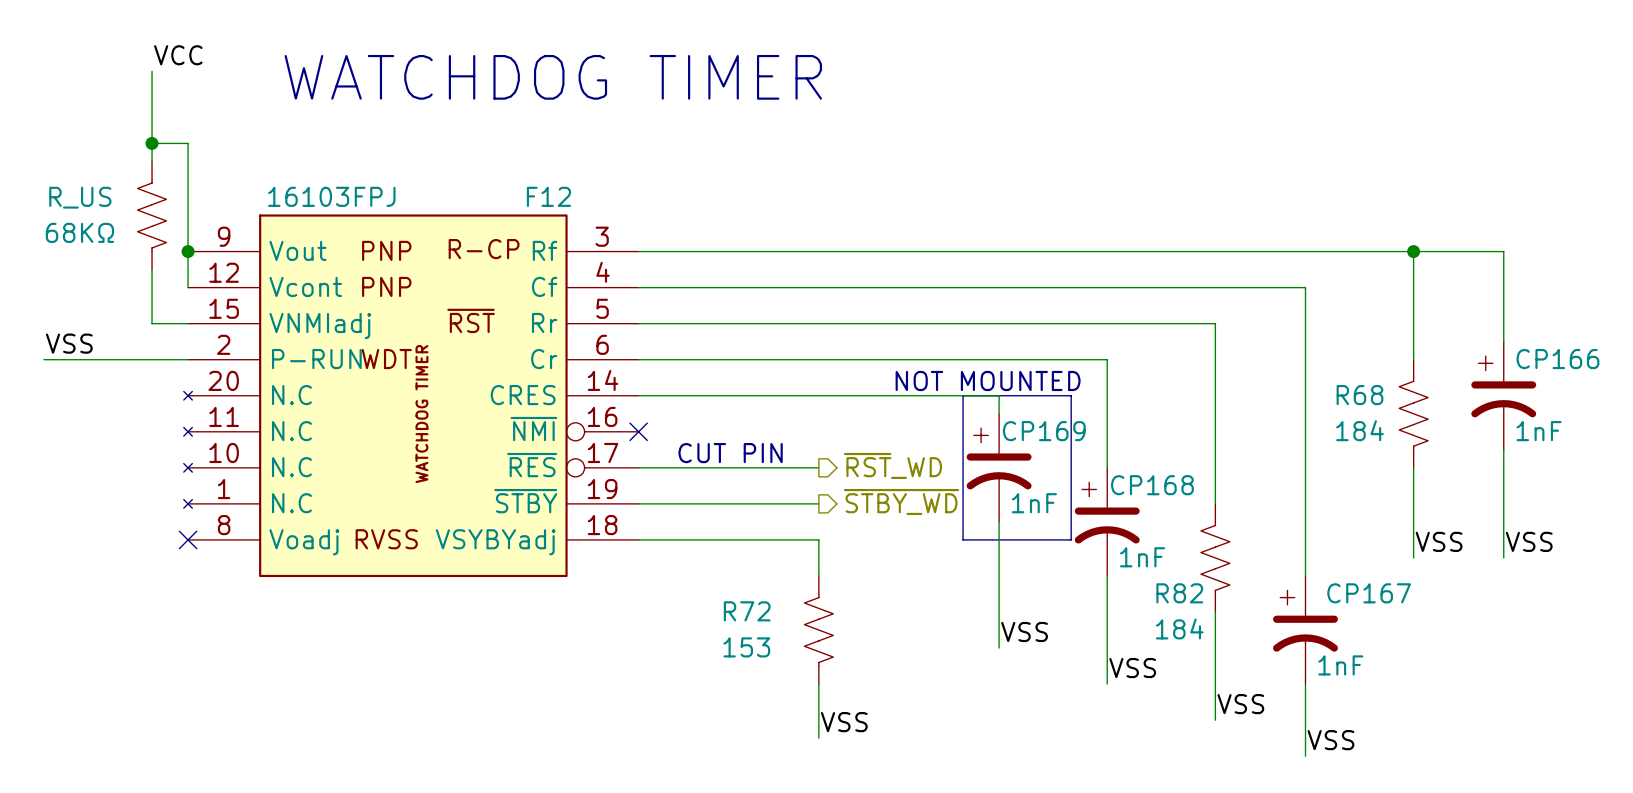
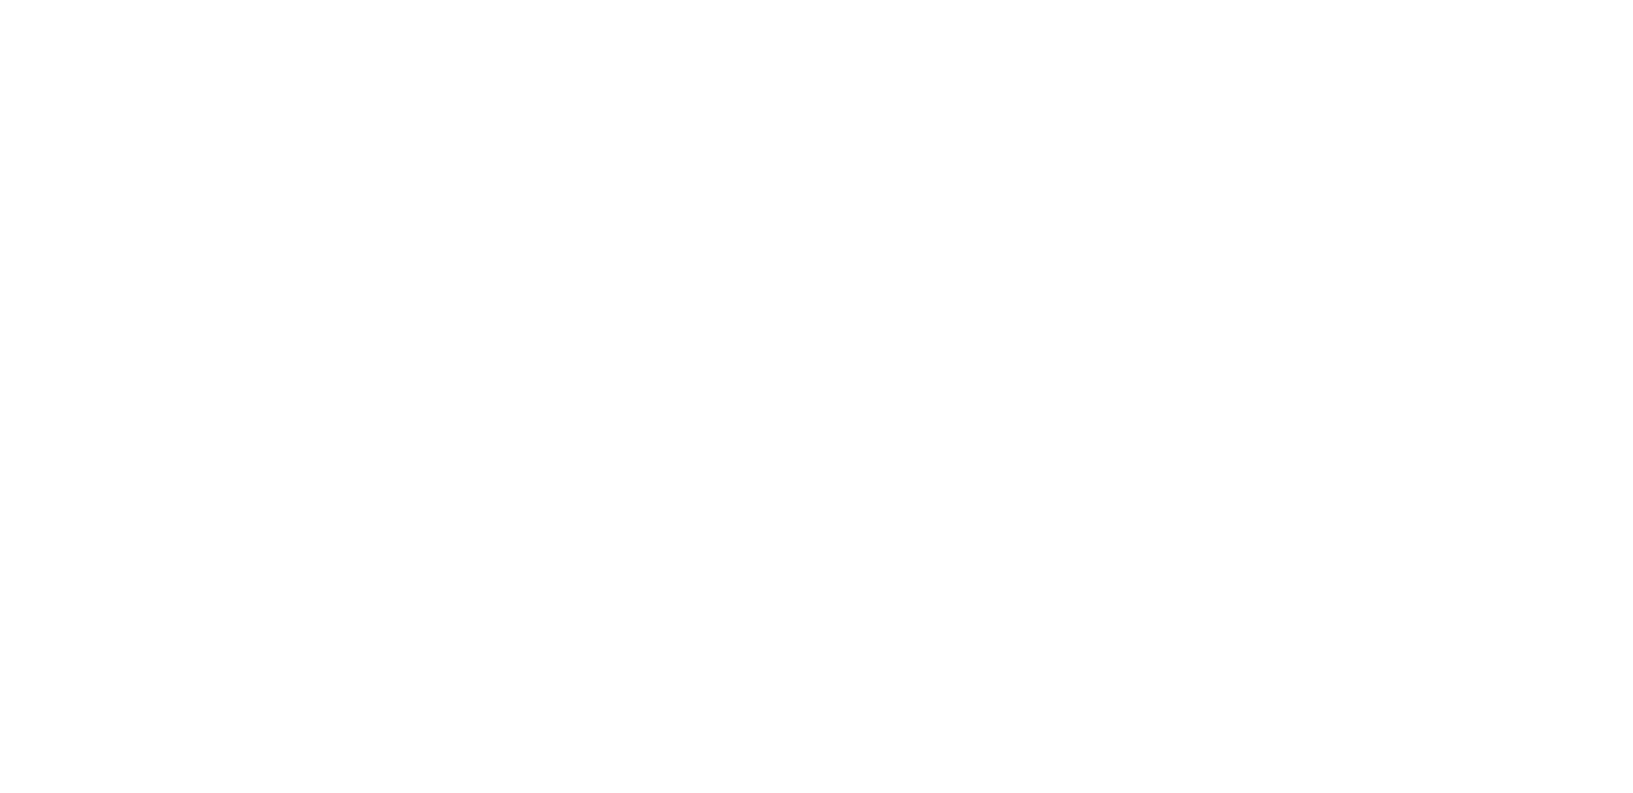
label: VCC (178, 55) -> none
wire: (152, 71) (152, 161) -> none
text: WATCHDOG TIMER (553, 77) -> none
wire: (152, 143) (188, 143) (188, 287) -> none
junction: (152, 143) -> none
R_US: 68KΩ (152, 215) -> none
junction: (188, 251) -> none
wire: (638, 251) (1503, 251) (1503, 341) -> none
wire: (1413, 251) (1413, 359) -> none
junction: (1413, 251) -> none
wire: (152, 269) (152, 323) (188, 323) -> none
wire: (638, 287) (1305, 287) (1305, 575) -> none
wire: (638, 323) (1215, 323) (1215, 503) -> none
label: VSS (69, 343) -> none
wire: (43, 359) (188, 359) -> none
wire: (638, 359) (1107, 359) (1107, 467) -> none
text: NOT MOUNTED (988, 380) -> none
F12: 16103FPJ (411, 395) -> none
wire: (638, 395) (999, 395) (999, 413) -> none
line: (963, 395) (963, 539) (1071, 539) (1071, 395) (963, 395) -> none
CP166: 1nF (1503, 395) -> none
R68: 184 (1413, 413) -> none
no-connect mark: (638, 431) -> none
wire: (1503, 449) (1503, 557) -> none
text: CUT PIN (730, 453) -> none
hierarchical label: ~{RST}_WD (893, 465) -> none
wire: (638, 467) (818, 467) -> none
CP169: 1nF (999, 467) -> none
wire: (1413, 467) (1413, 557) -> none
hierarchical label: ~{STBY_WD} (901, 502) -> none
wire: (638, 503) (818, 503) -> none
wire: (999, 521) (999, 648) -> none
CP168: 1nF (1107, 521) -> none
no-connect mark: (188, 539) -> none
wire: (638, 539) (818, 539) (818, 575) -> none
label: VSS (1439, 541) -> none
label: VSS (1529, 541) -> none
R82: 184 (1215, 557) -> none
wire: (1107, 575) (1107, 684) -> none
wire: (1215, 612) (1215, 720) -> none
R72: 153 (818, 630) -> none
CP167: 1nF (1305, 630) -> none
label: VSS (1024, 631) -> none
label: VSS (1132, 668) -> none
wire: (818, 684) (818, 738) -> none
wire: (1305, 684) (1305, 756) -> none
label: VSS (1240, 704) -> none
label: VSS (844, 722) -> none
label: VSS (1330, 740) -> none

